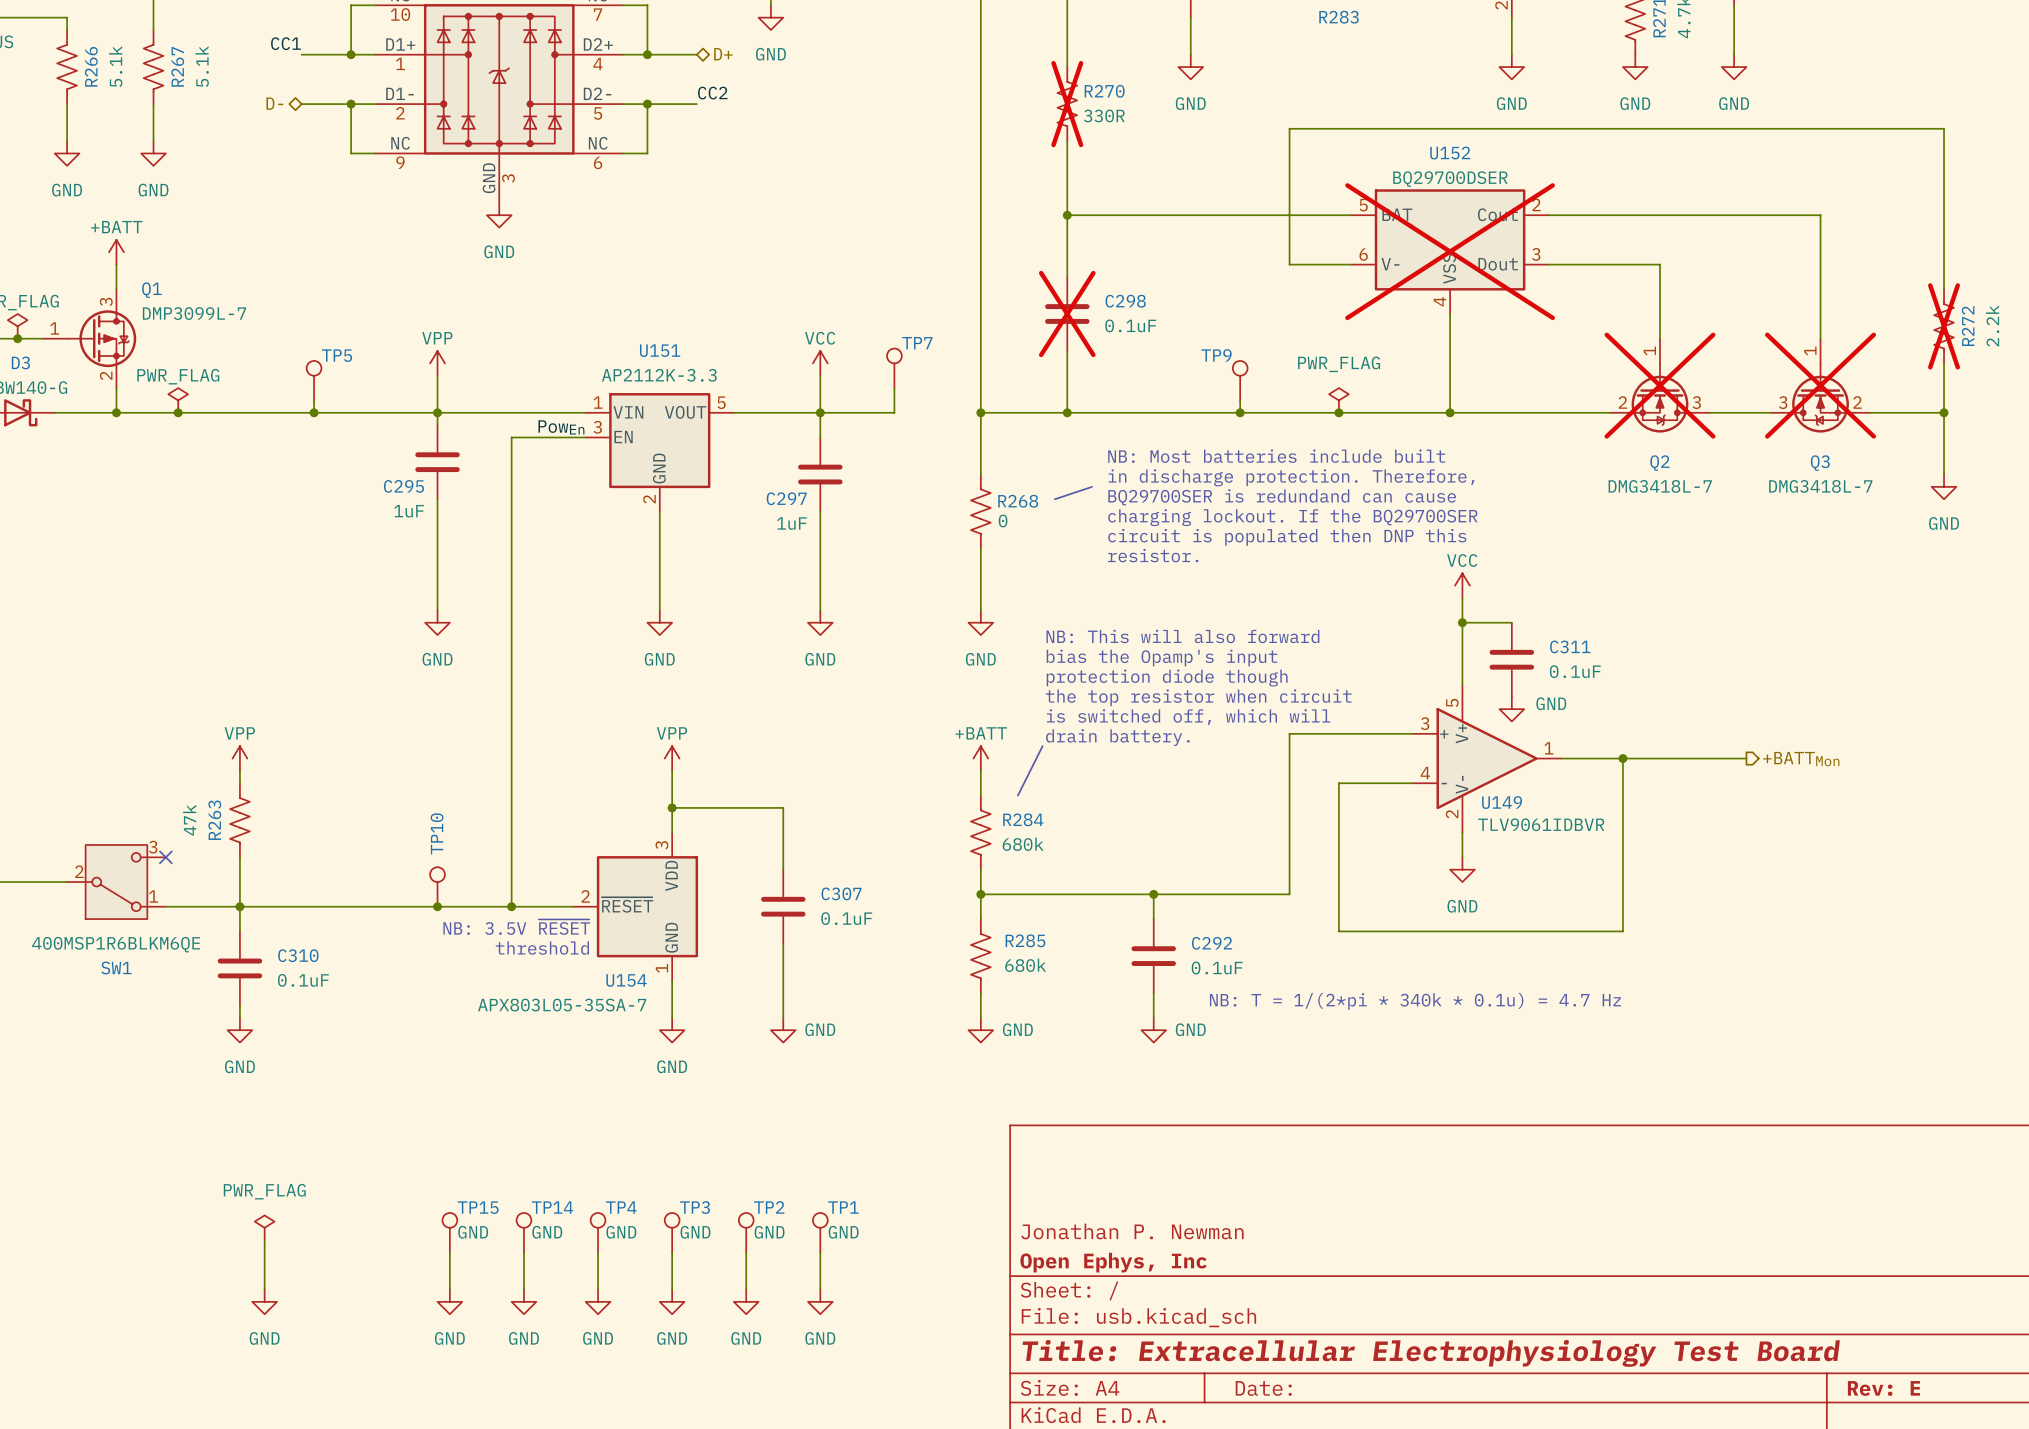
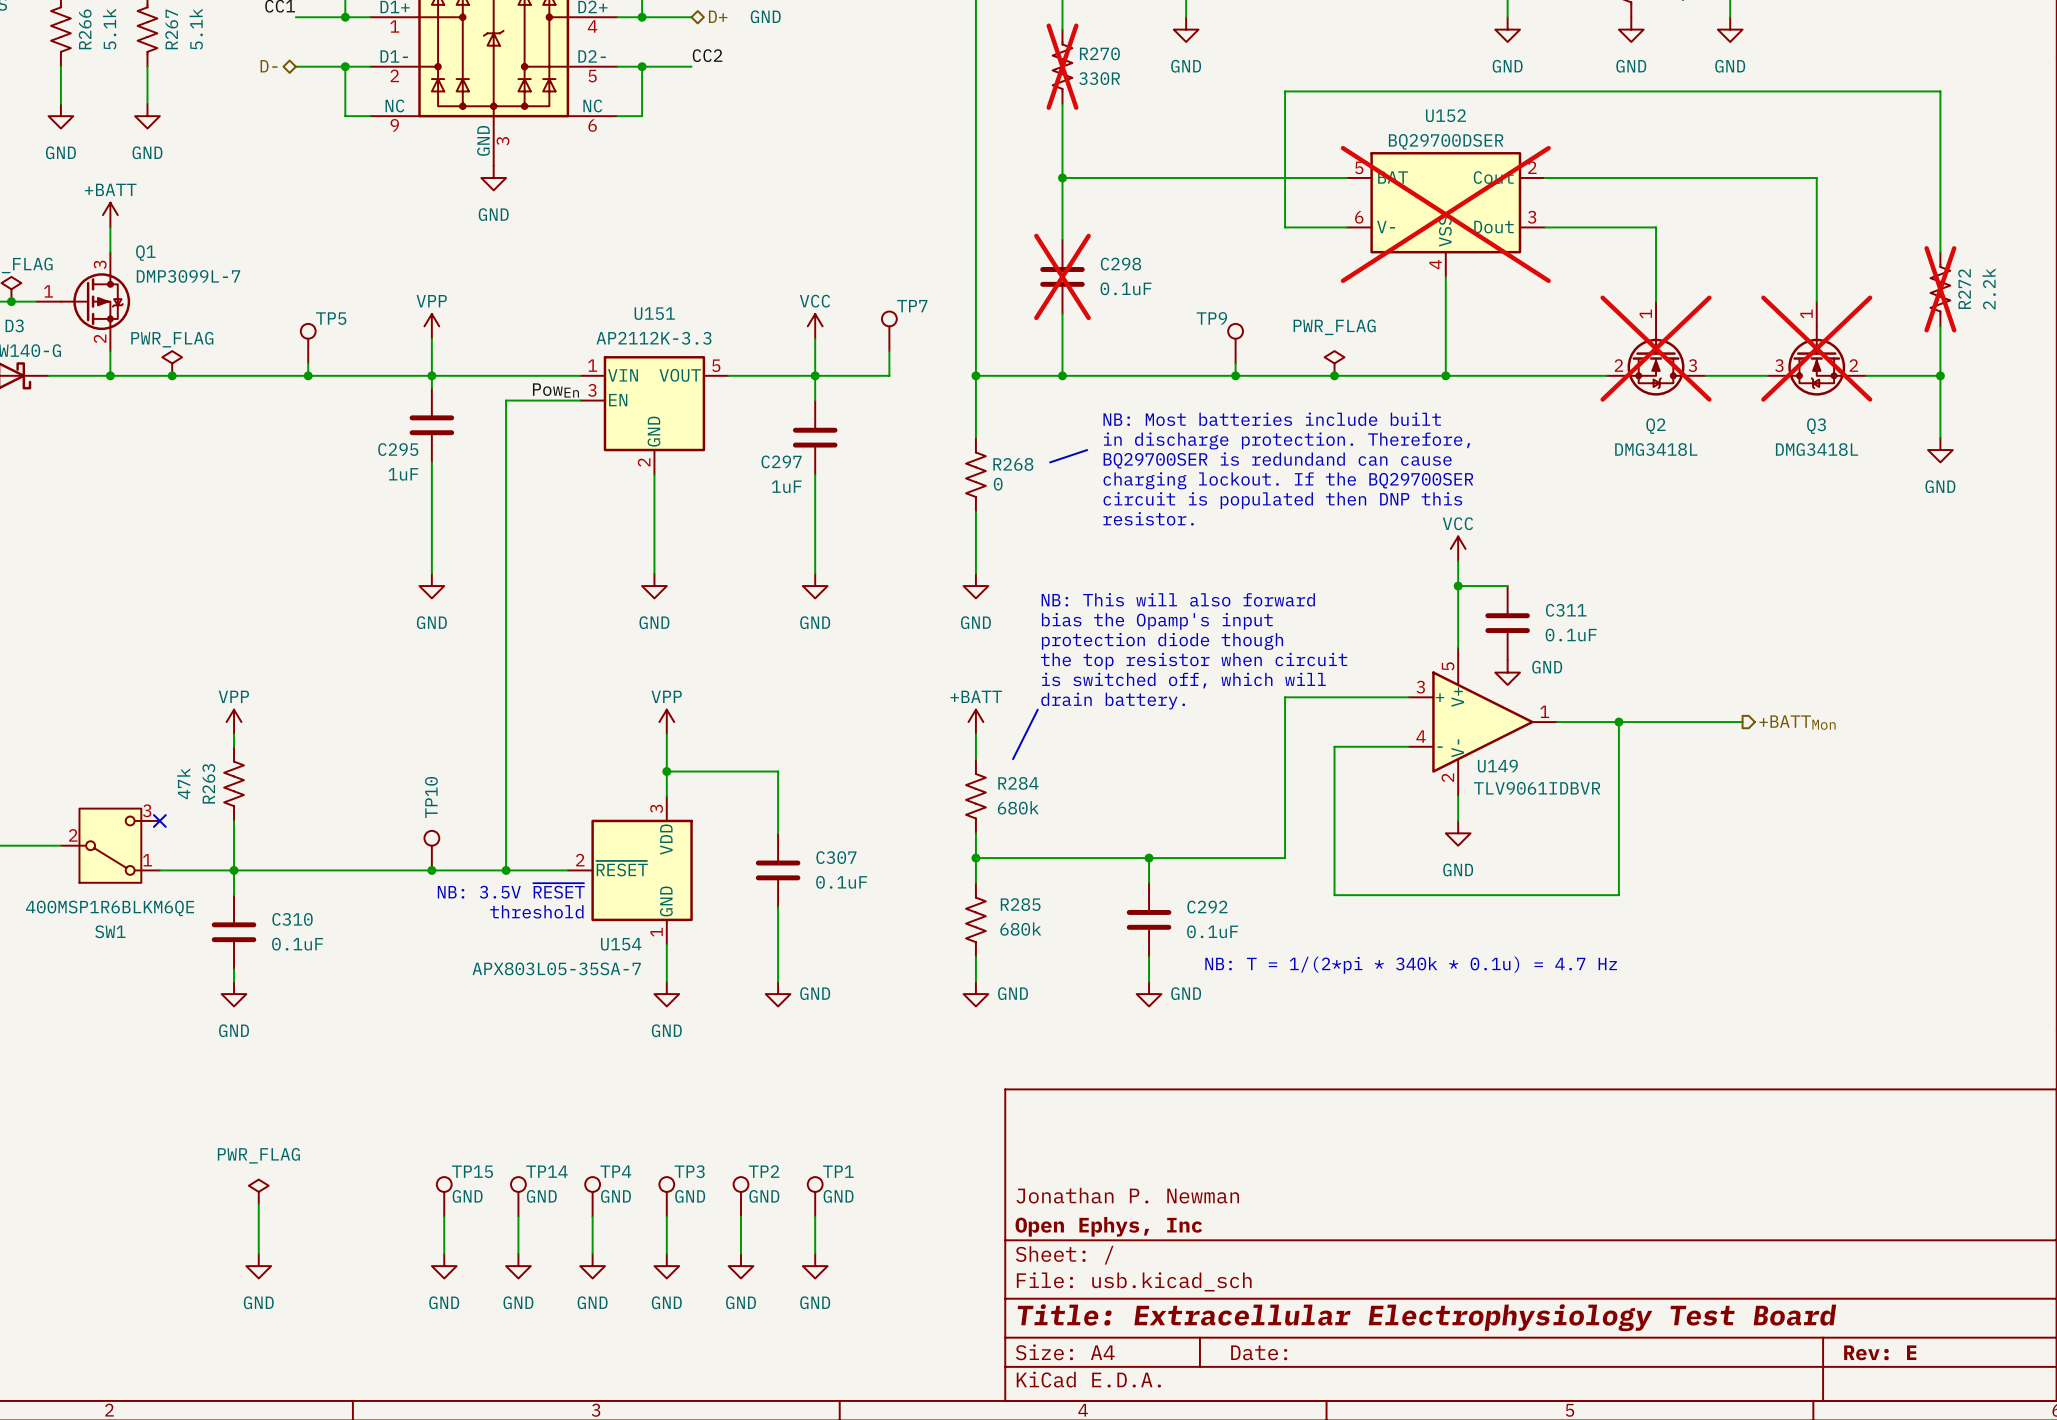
Q2 value: DMG3418L-7 (1660, 486) -> DMG3418L (1656, 449)
Q3 value: DMG3418L-7 (1820, 486) -> DMG3418L (1817, 449)

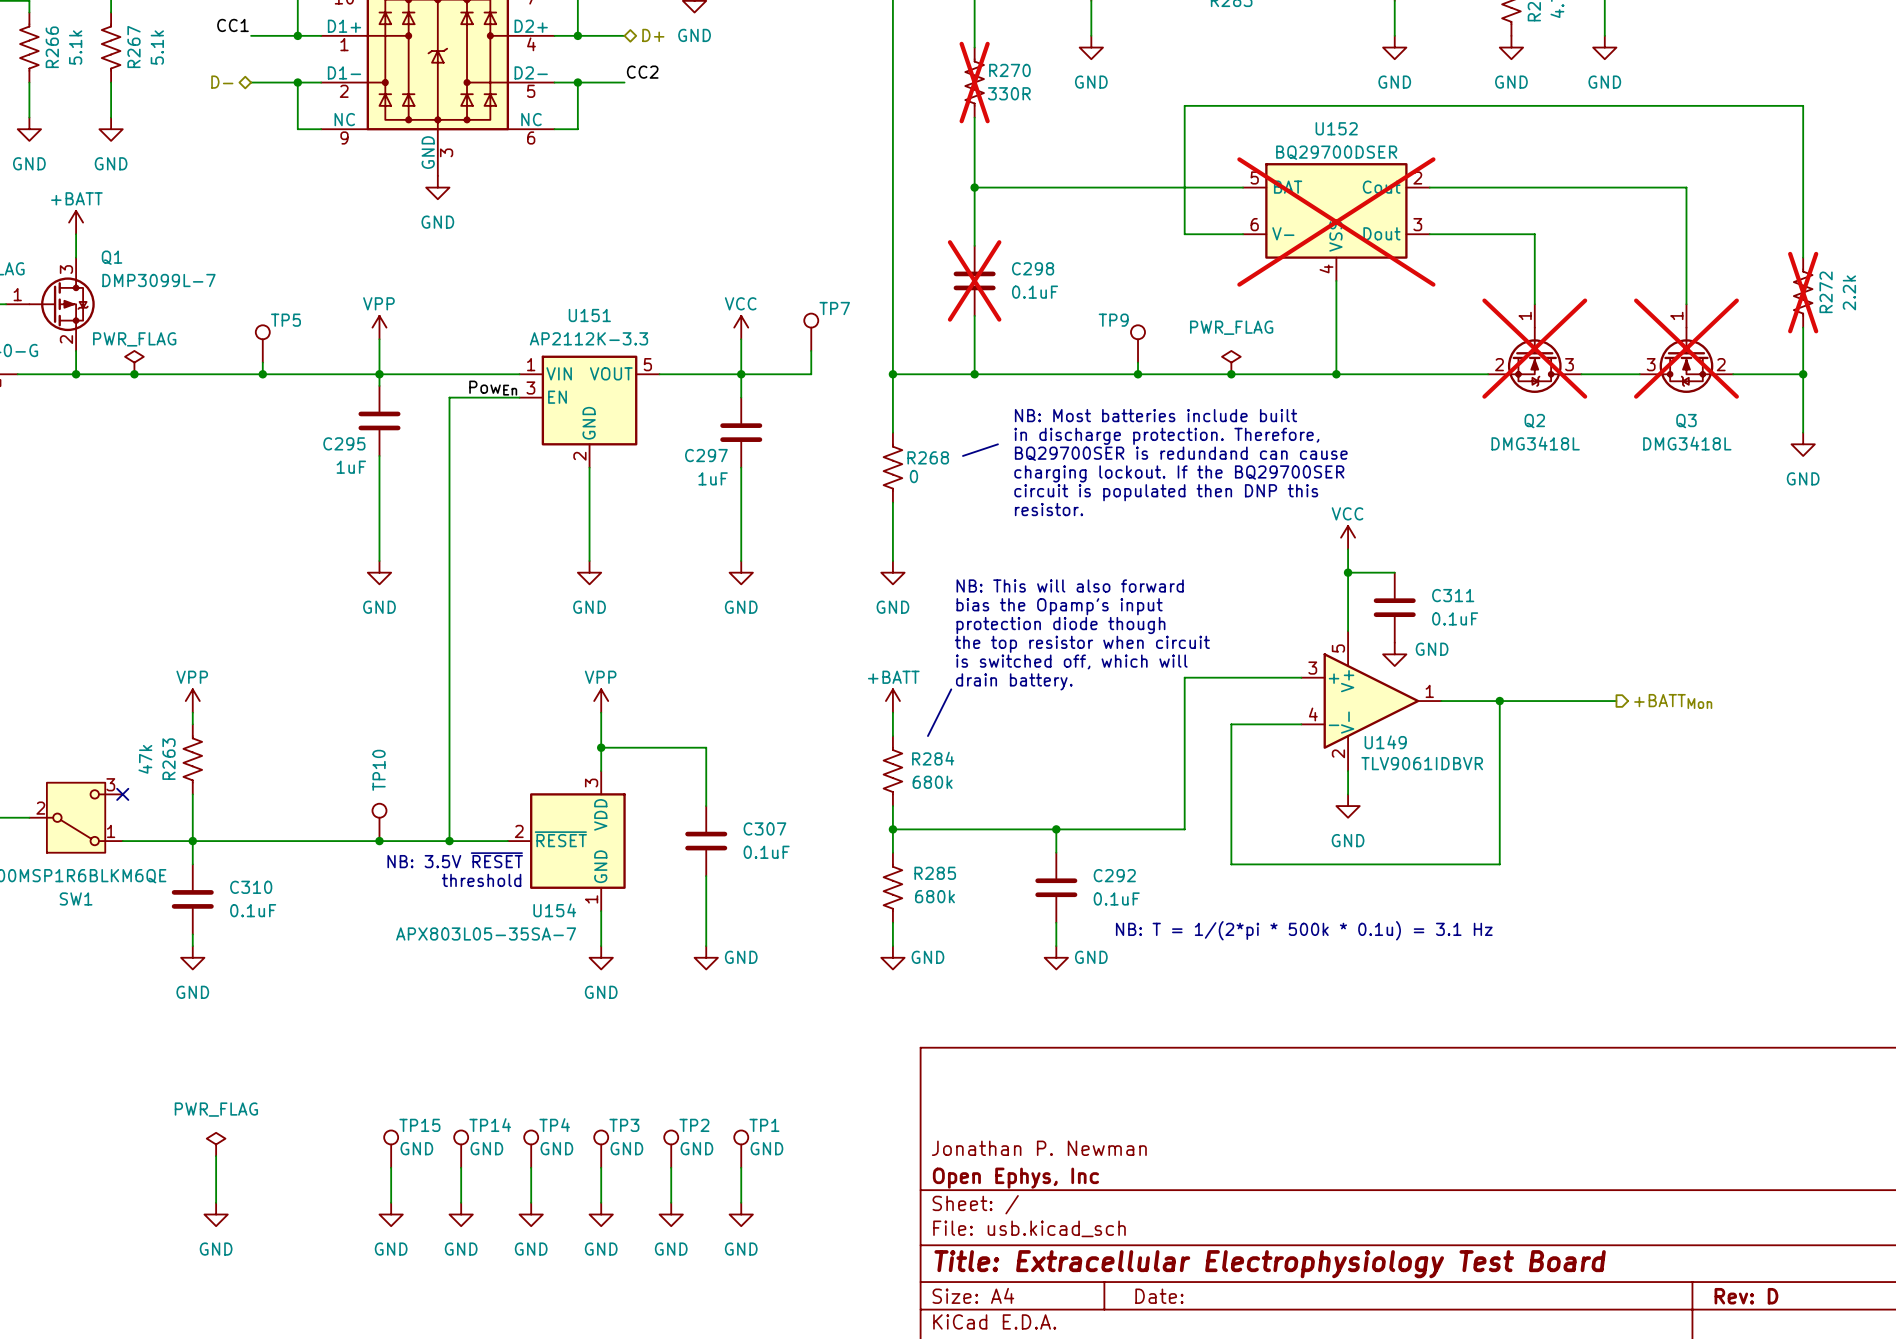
text: NB: T = 1/(2*pi * 340k * 0.1u) = 4.7 Hz (1411, 965) -> NB: T = 1/(2*pi * 500k * 0.1u) = 3.1 Hz (1304, 930)
title block: Rev: E (1880, 1352) -> Rev: D (1746, 1296)

